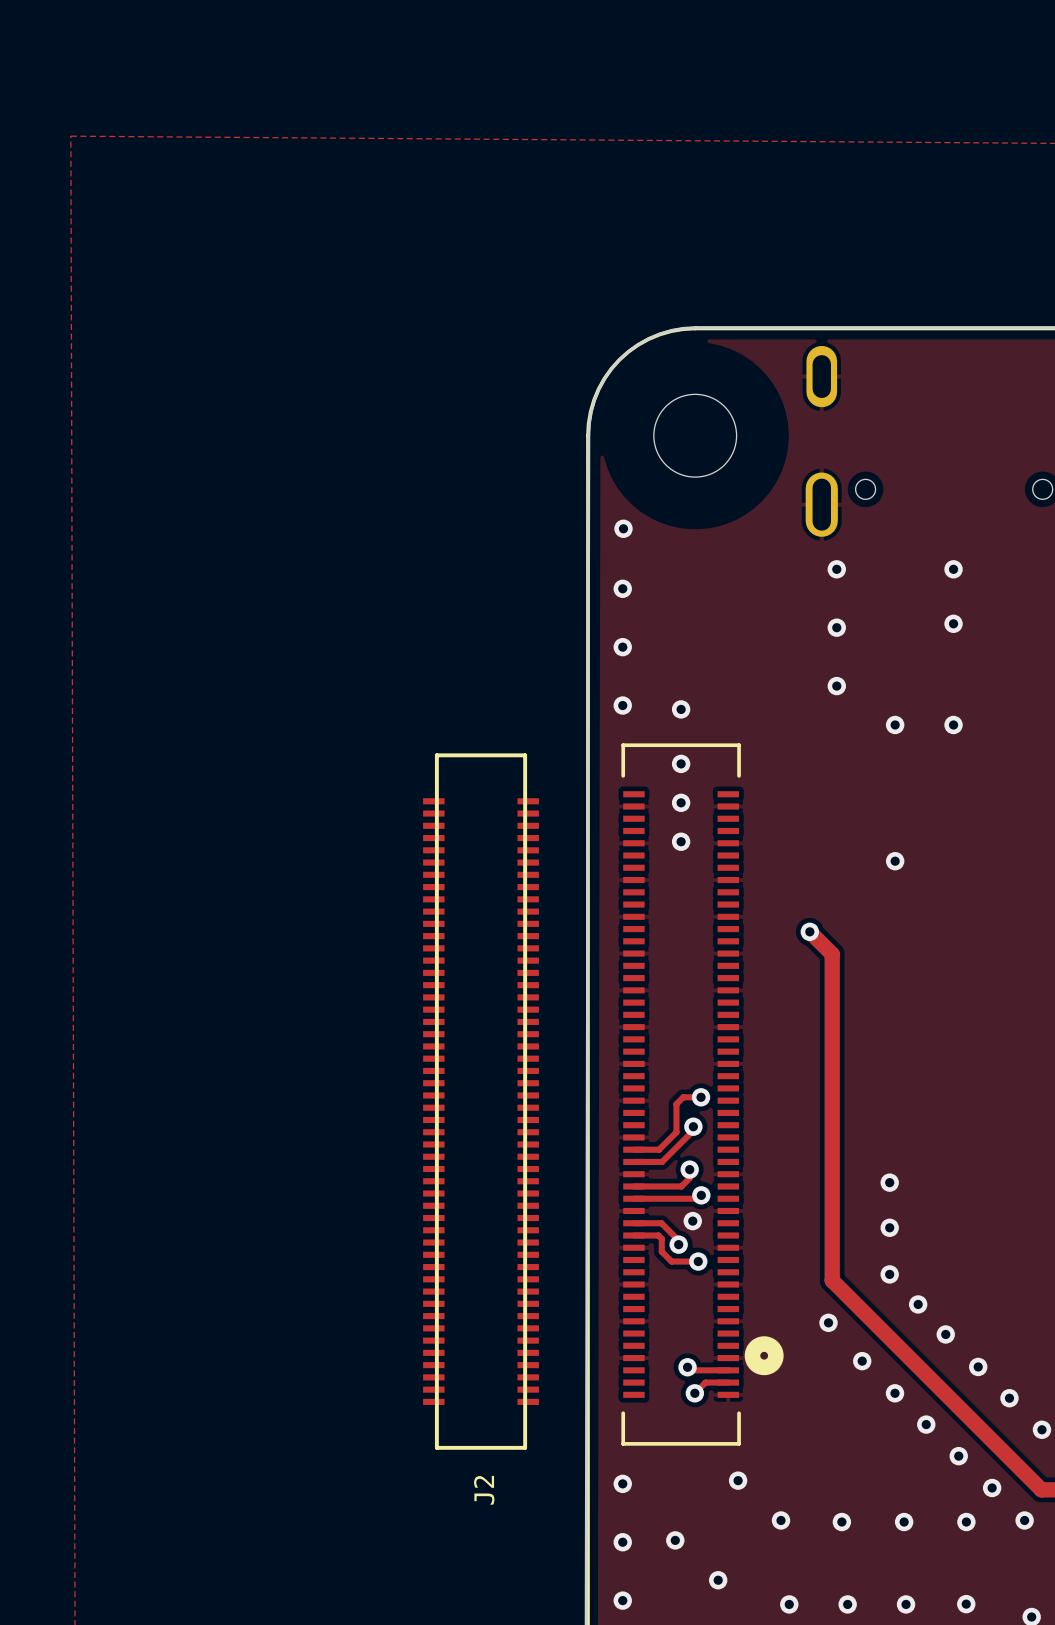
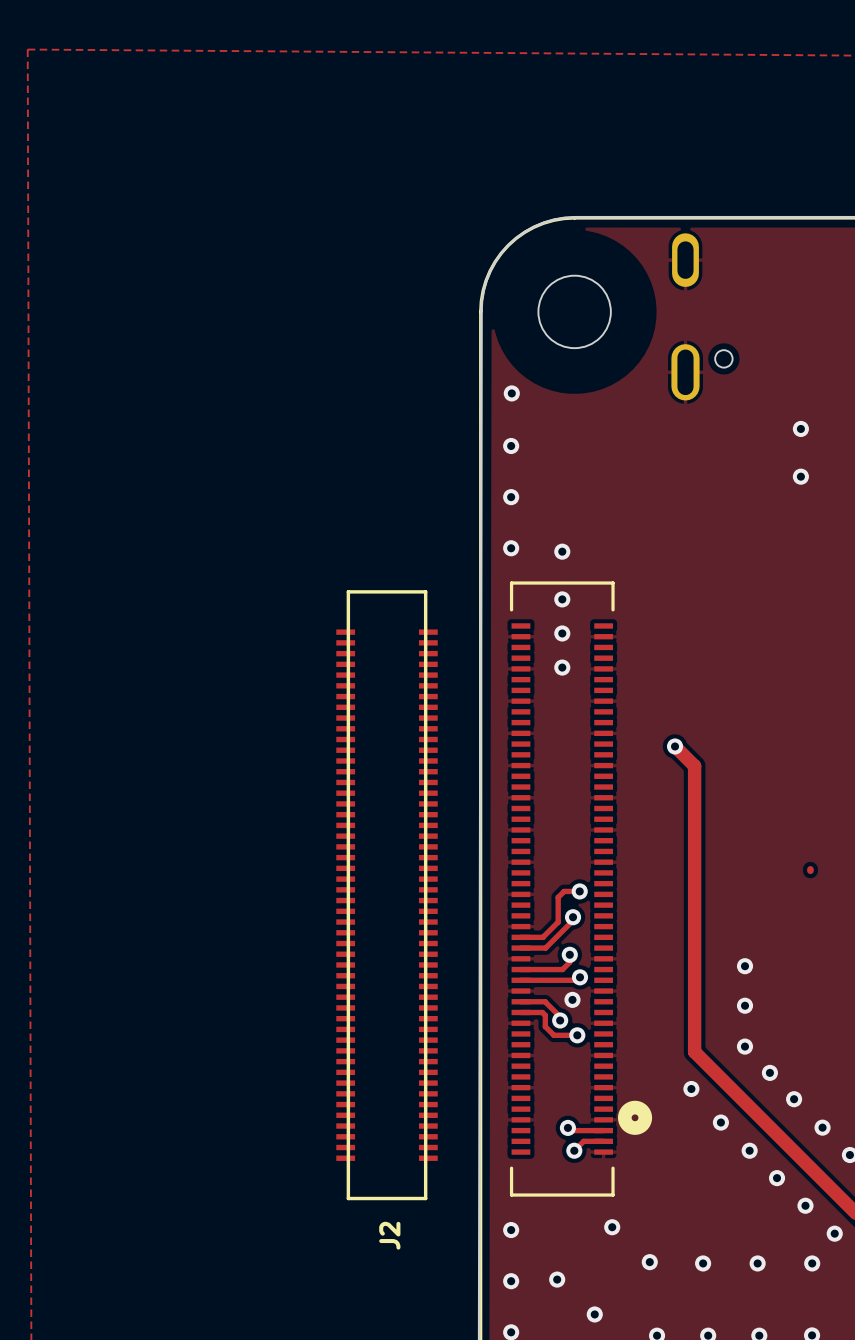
via: (836, 569) -> none
via: (836, 627) -> none
via: (836, 686) -> none
via: (895, 724) -> none
via: (953, 724) -> none
via: (895, 861) -> none
track: none -> (810, 869) (810, 870)

